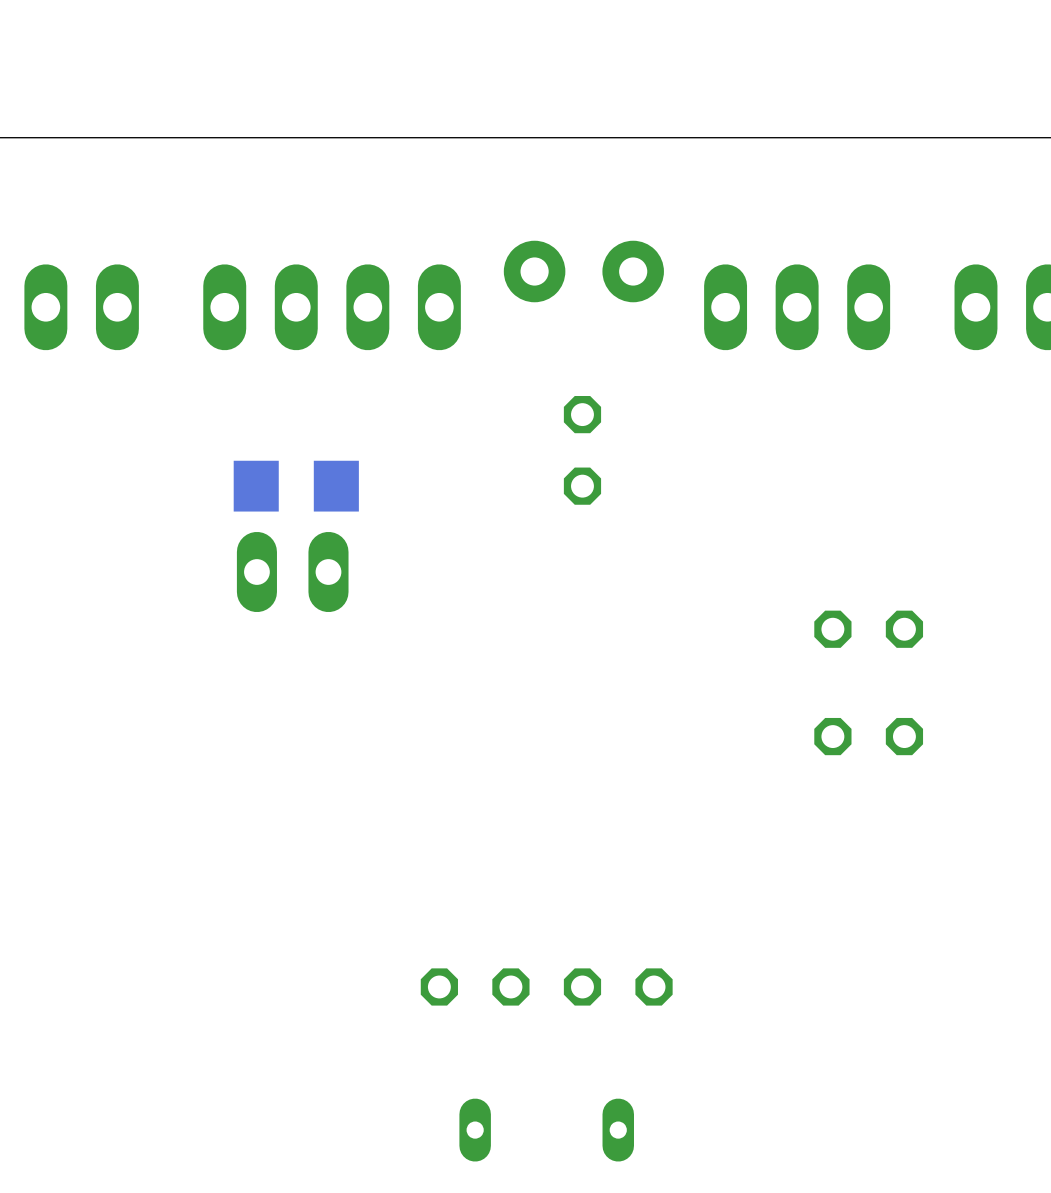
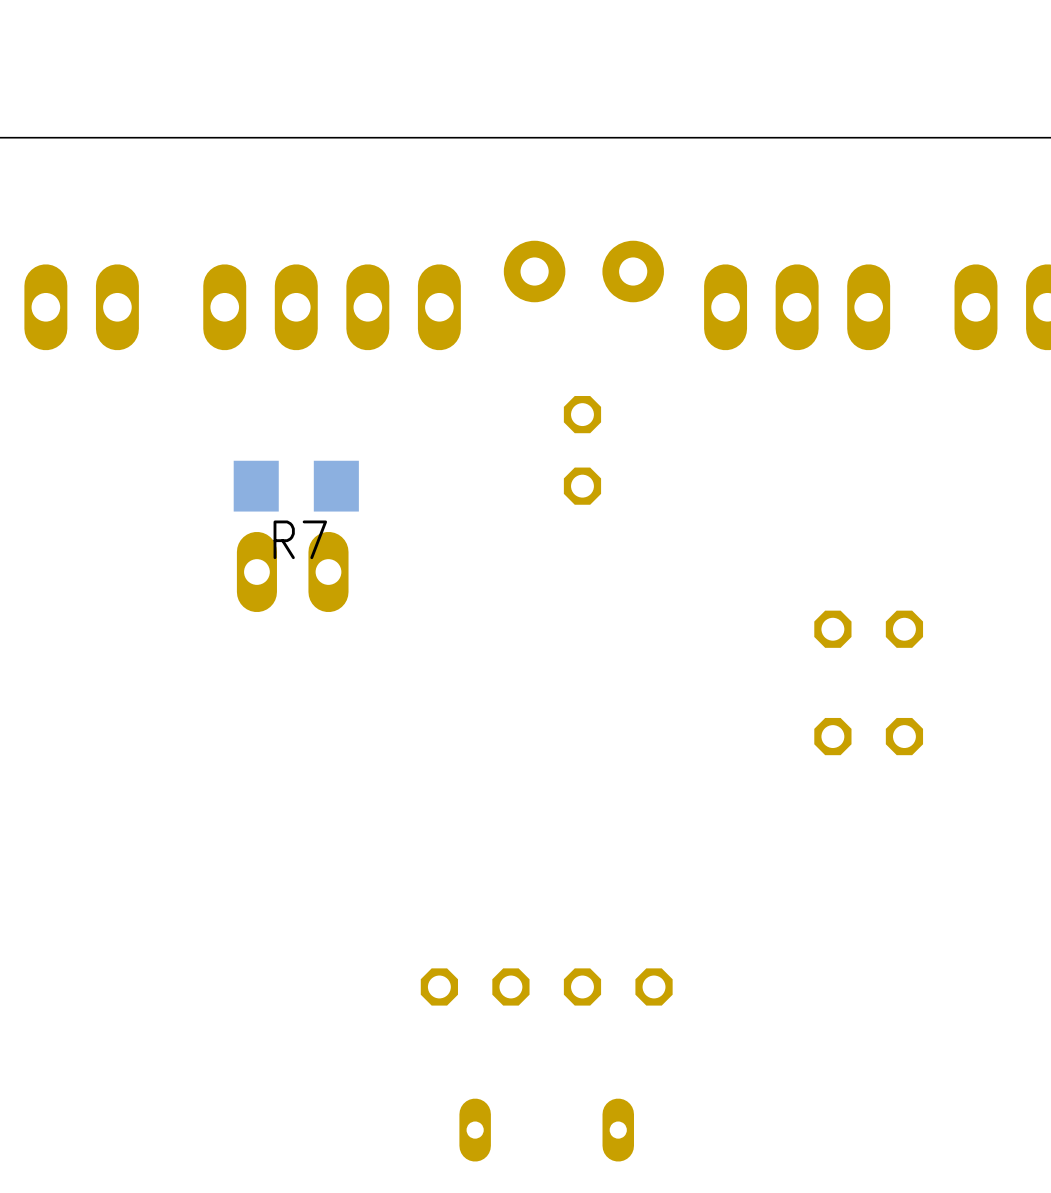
R7 name: none -> R7 (300, 539)

